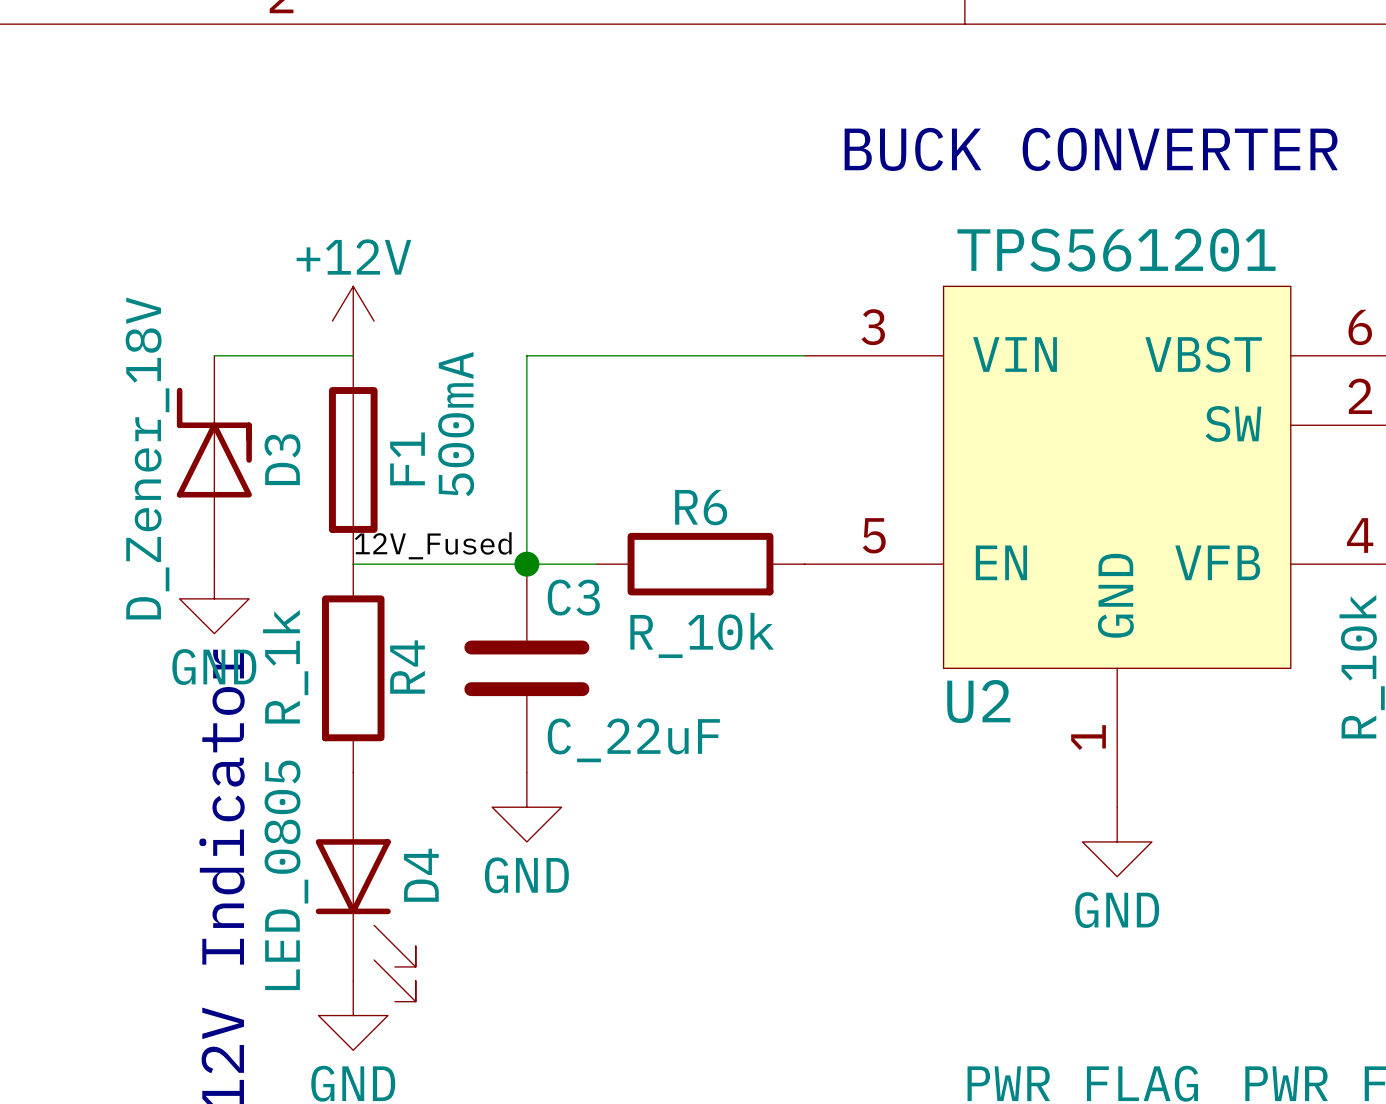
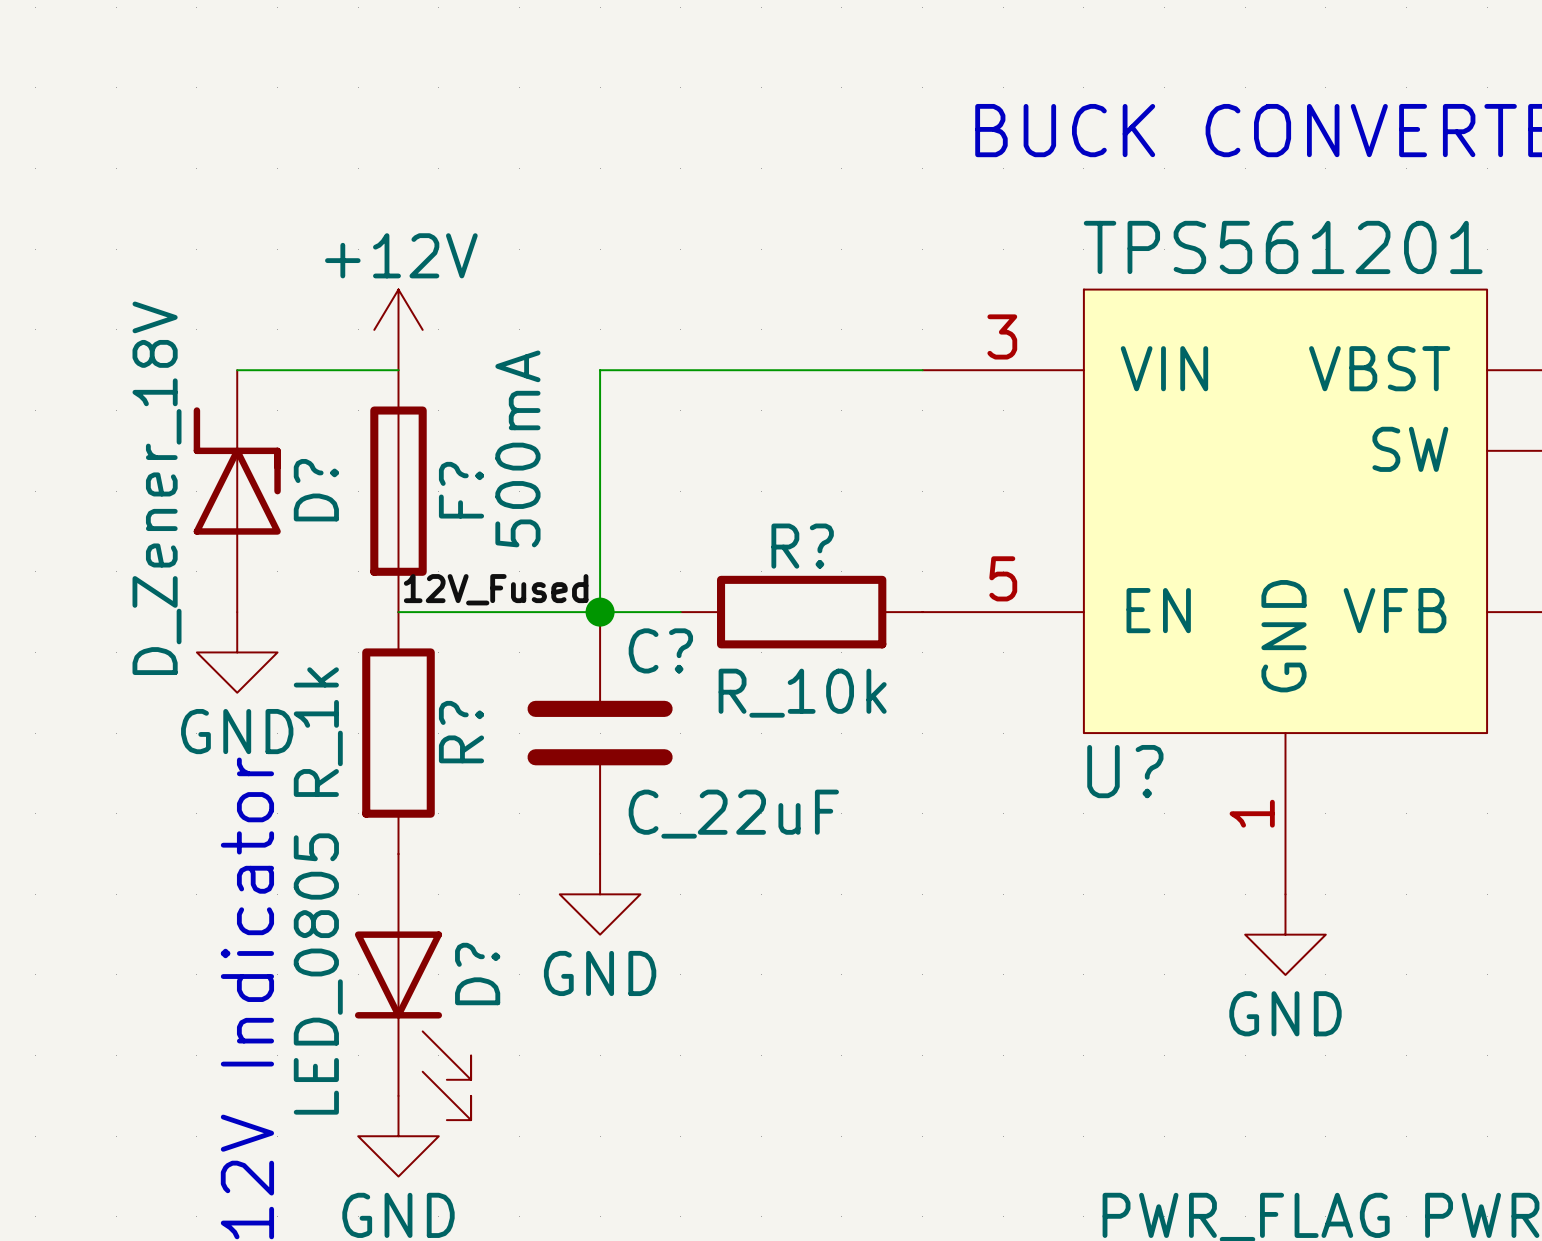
F1 name: F1 (407, 458) -> F? (461, 490)
D3 name: D3 (282, 459) -> D? (316, 490)
R6 name: R6 (701, 507) -> R? (802, 546)
C3 name: C3 (573, 597) -> C? (660, 650)
R4 name: R4 (407, 667) -> R? (461, 732)
U2 name: U2 (978, 701) -> U? (1125, 771)
D4 name: D4 (421, 875) -> D? (477, 974)

